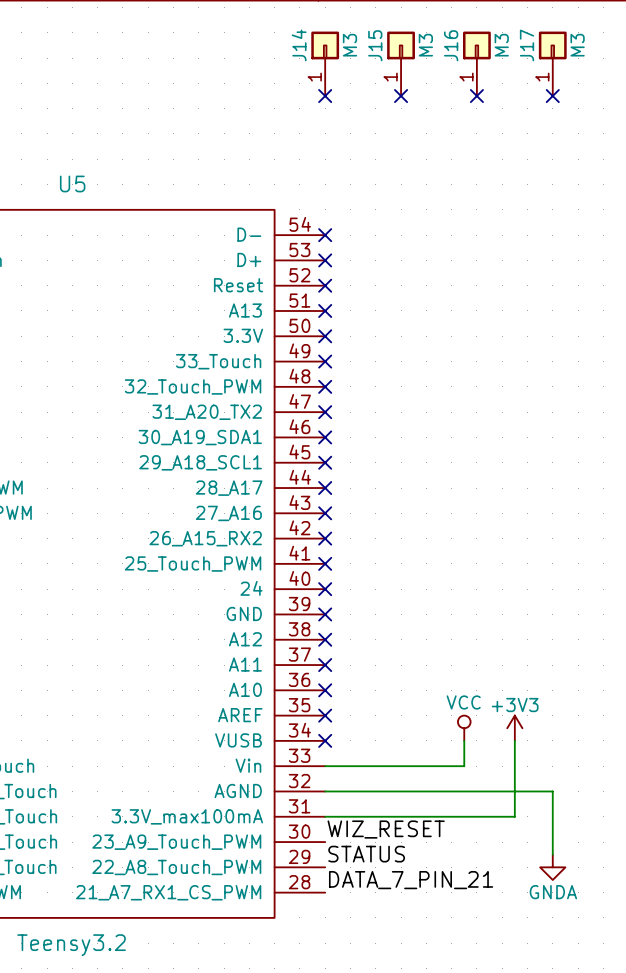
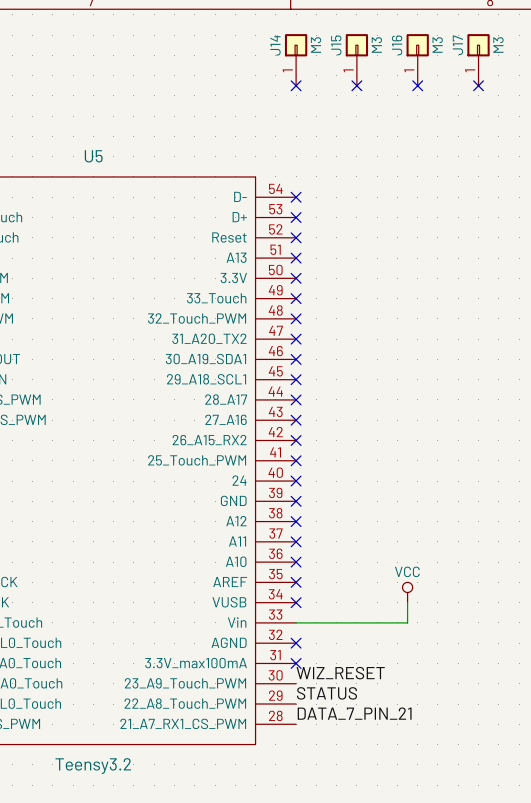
power symbol: +3V3 (514, 728) -> none
wire: (514, 740) (514, 816) (325, 816) -> none
wire: (325, 791) (552, 791) (552, 854) -> none
no-connect mark: none -> (296, 643)
no-connect mark: none -> (296, 663)
power symbol: GNDA (552, 867) -> none

